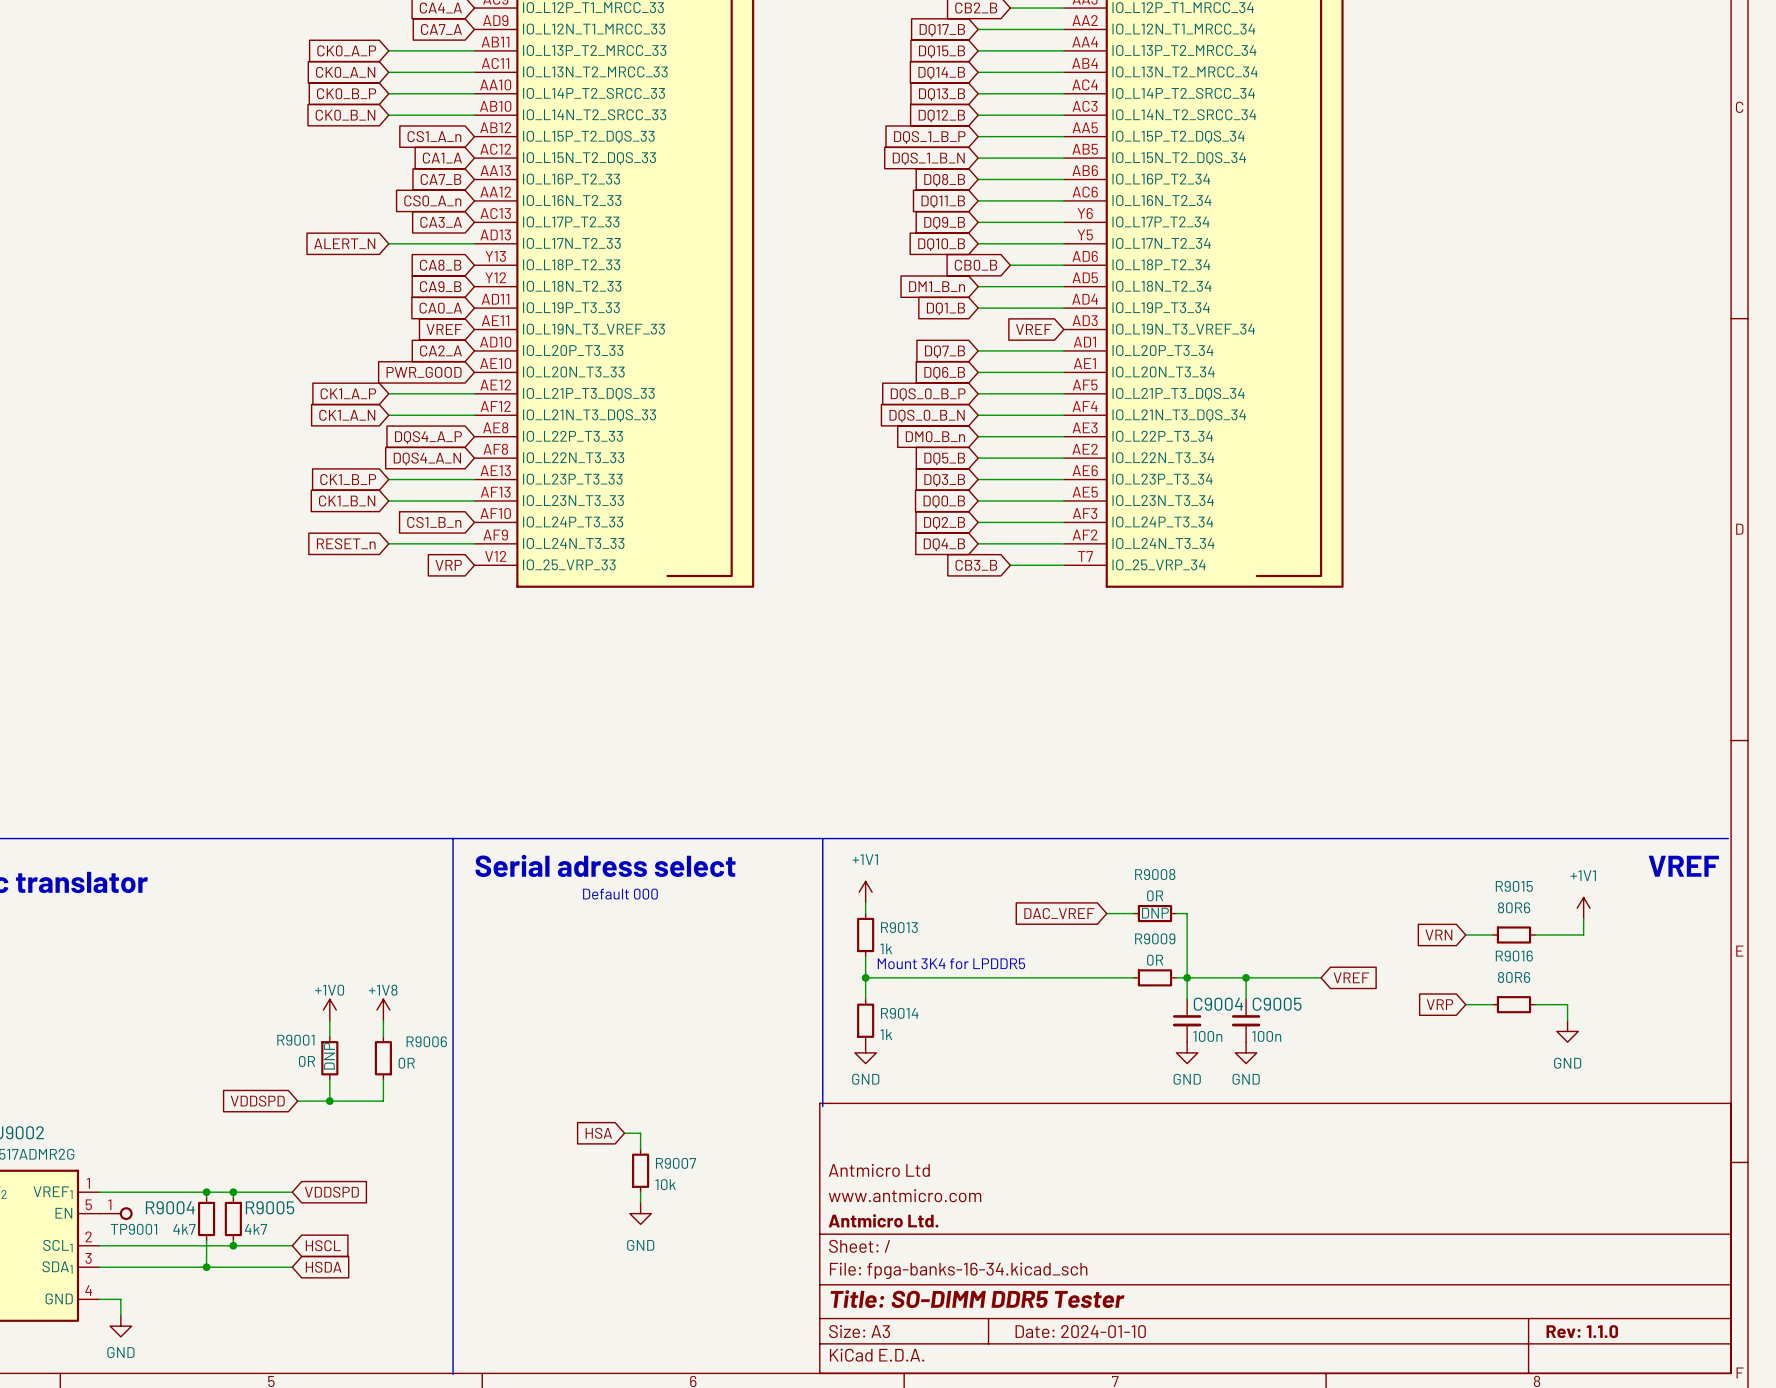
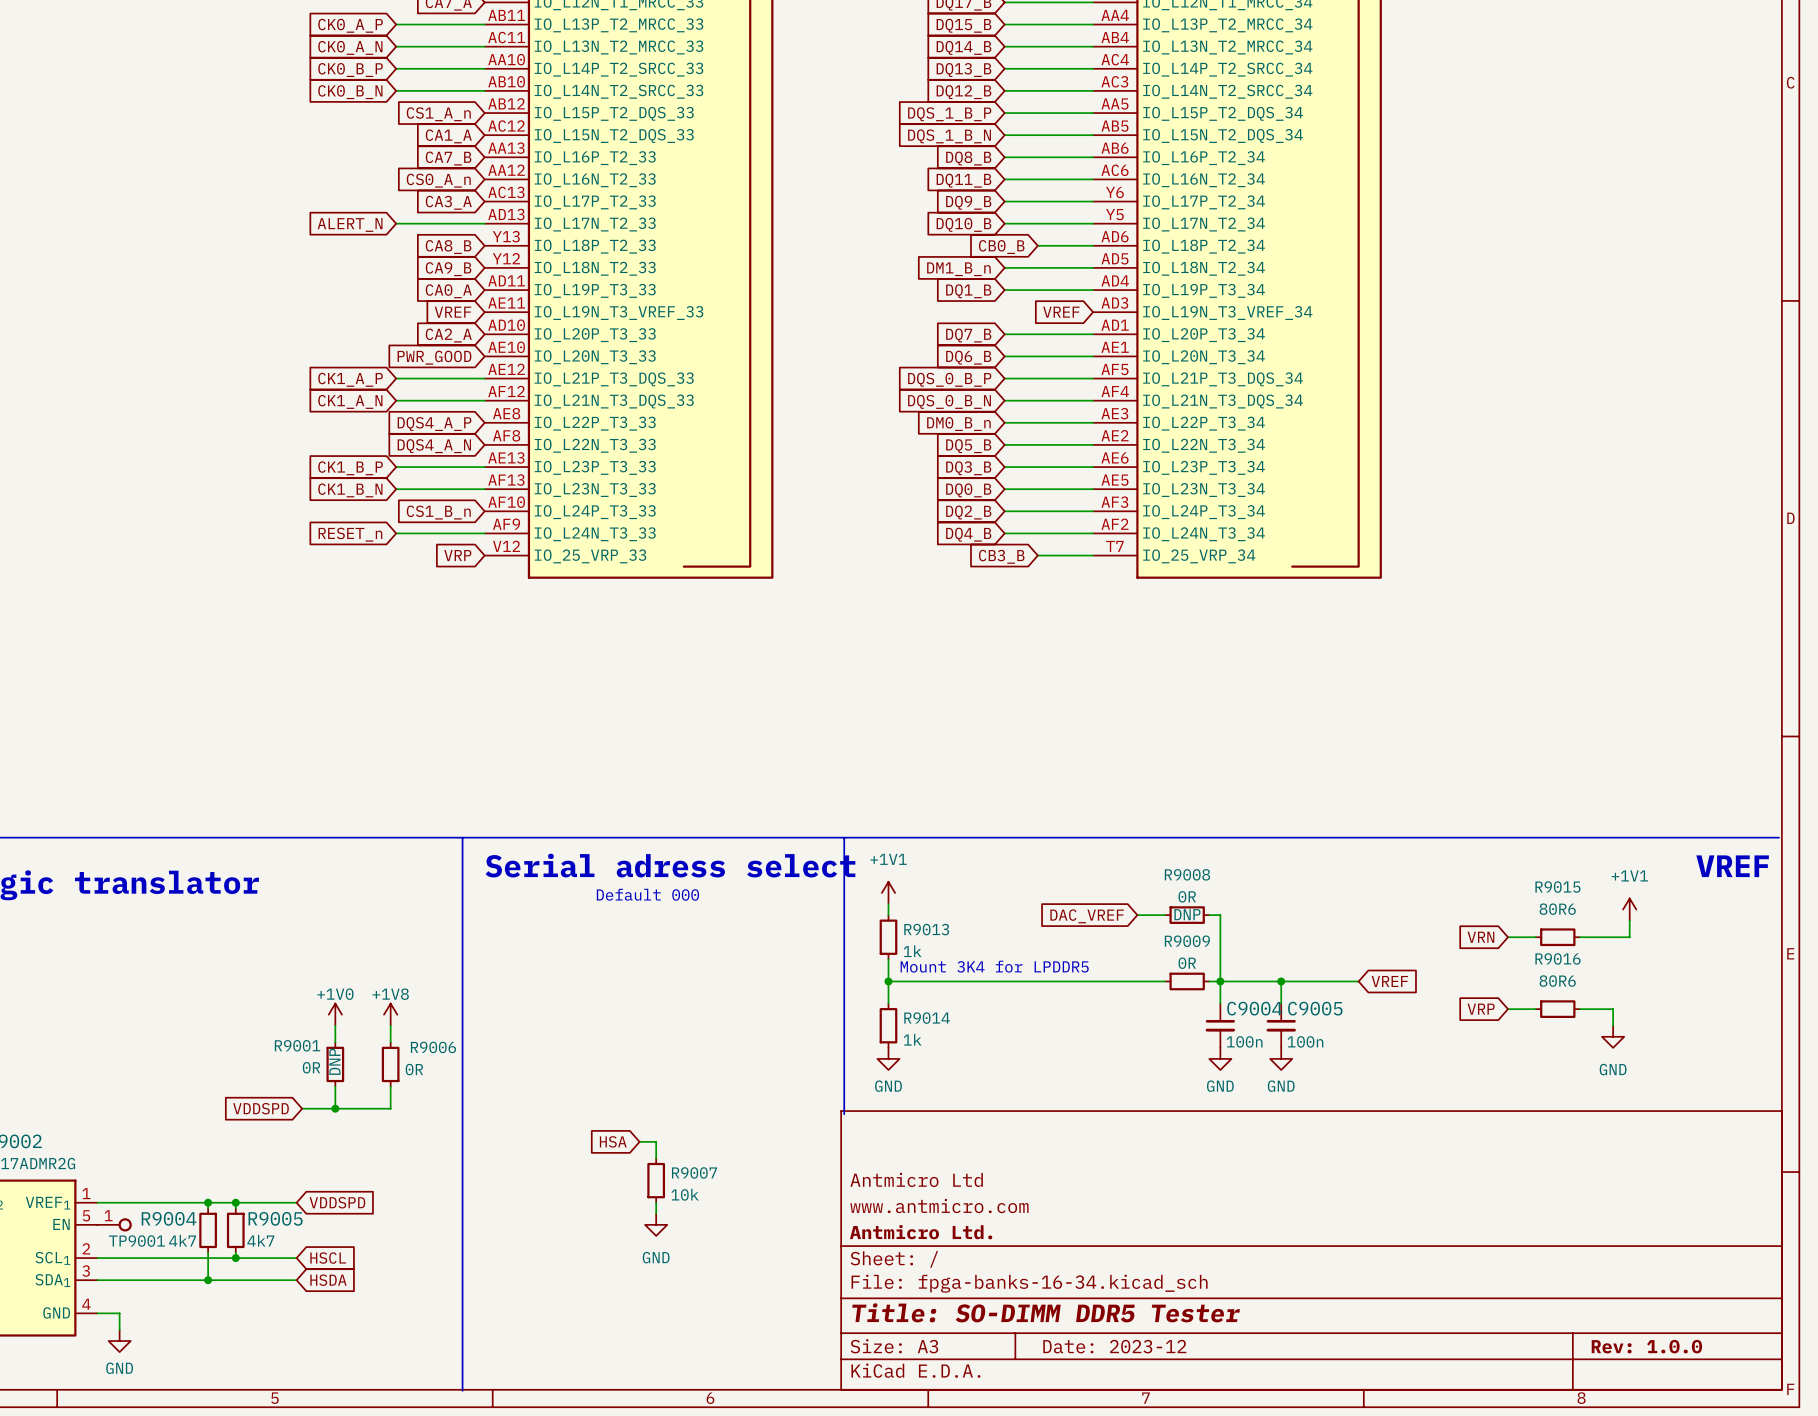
title block: Date: 2024-01-10 (1080, 1331) -> Date: 2023-12 (1114, 1346)
title block: Rev: 1.1.0 (1582, 1331) -> Rev: 1.0.0 (1646, 1346)

